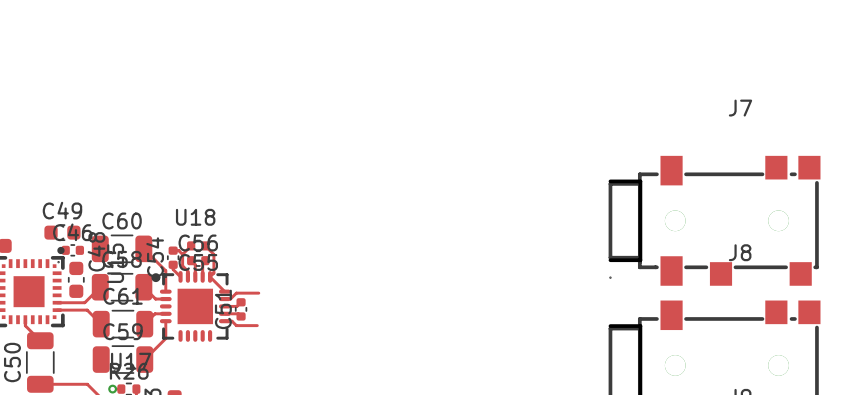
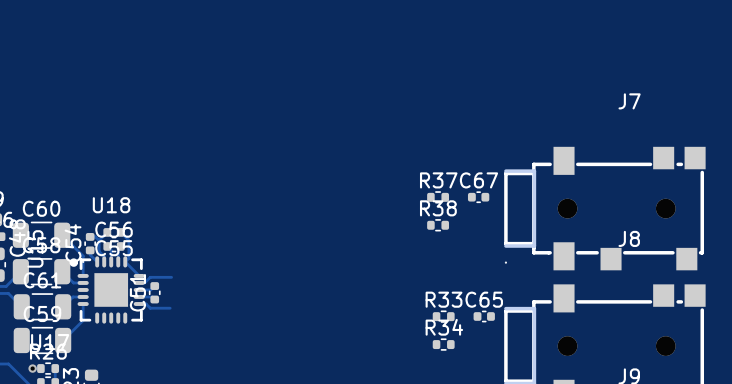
C67: none -> (478, 197)
R37: none -> (438, 197)
R38: none -> (438, 225)
R33: none -> (443, 316)
C65: none -> (484, 316)
R34: none -> (443, 344)

